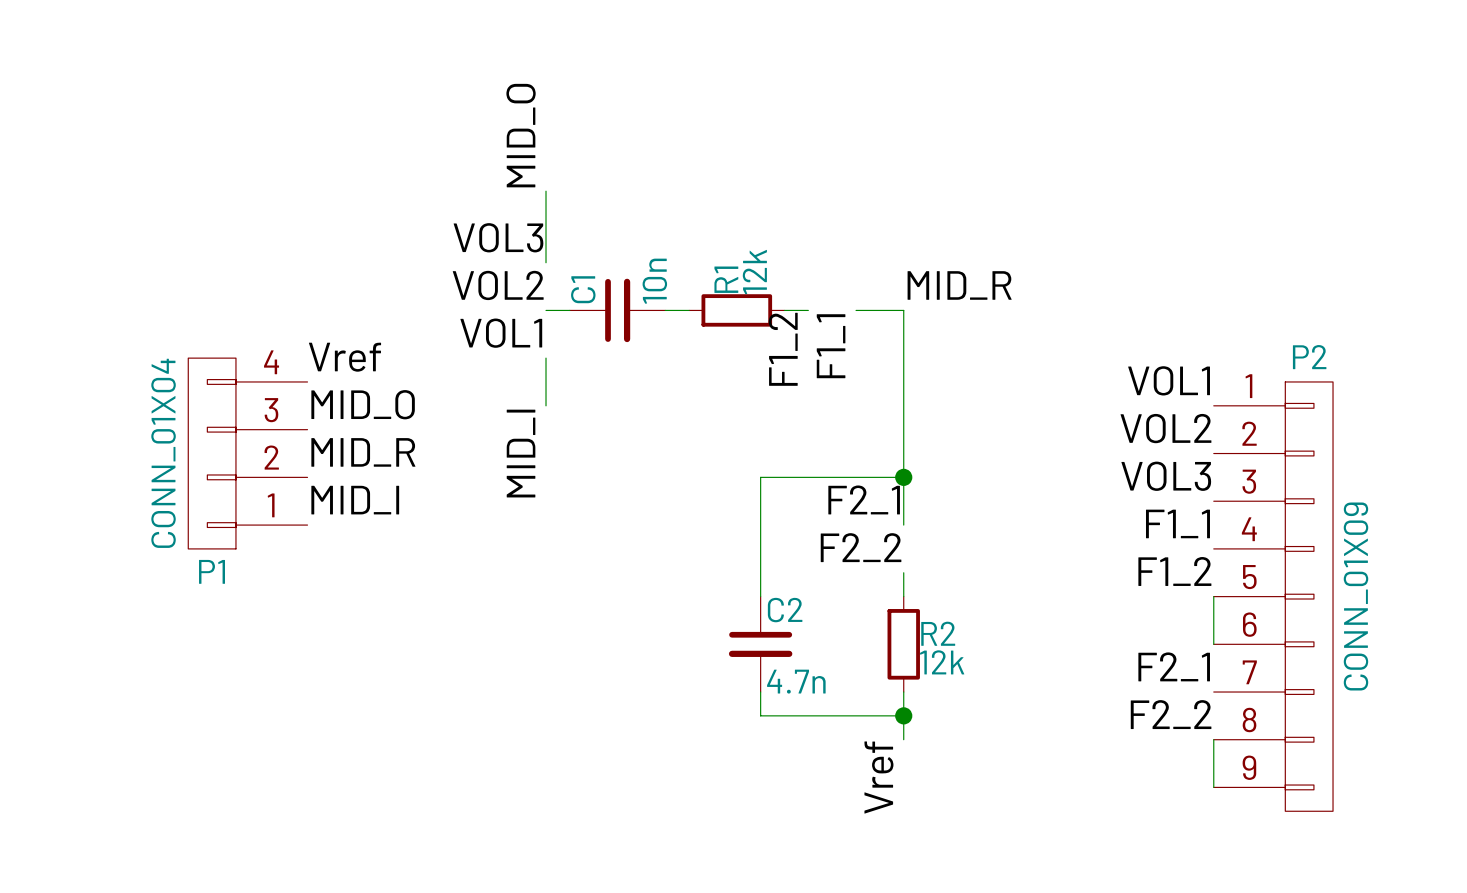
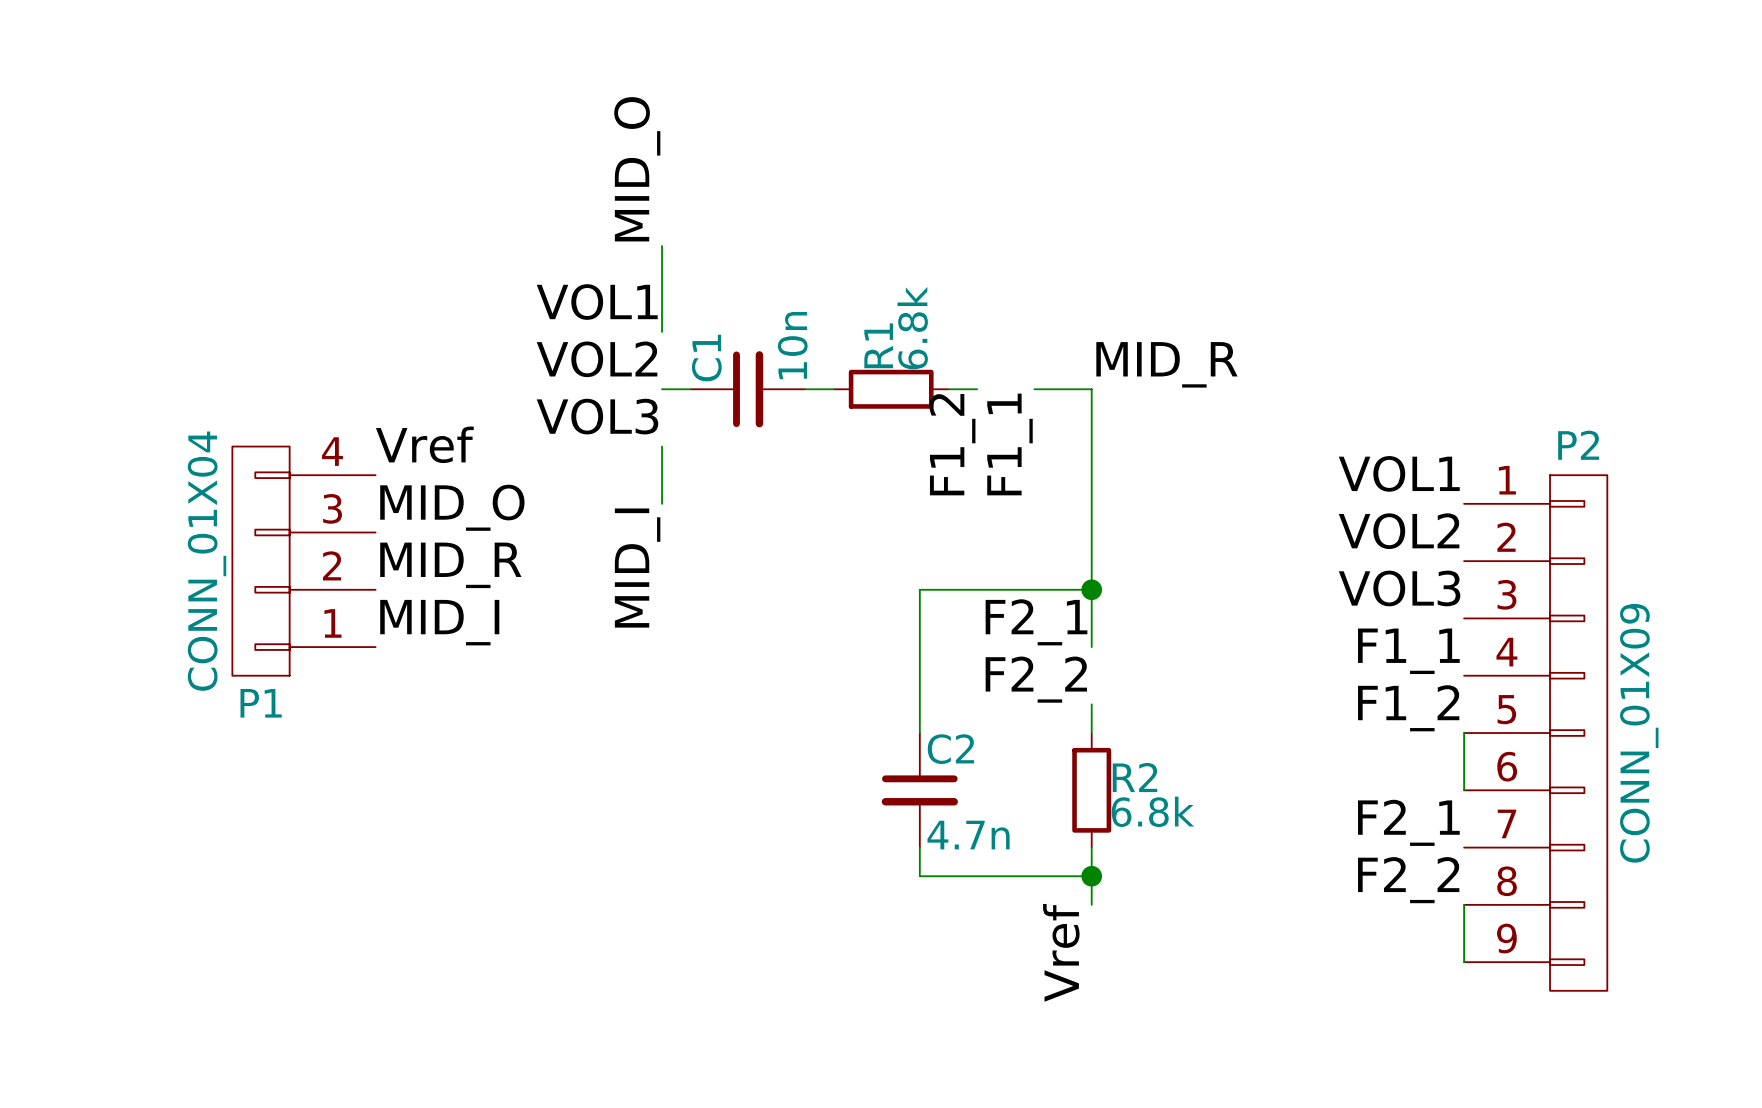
label: VOL3 (498, 237) -> VOL1 (597, 302)
R1 value: 12k (754, 272) -> 6.8k (912, 328)
label: VOL1 (501, 333) -> VOL3 (597, 416)
R2 value: 12k (942, 662) -> 6.8k (1152, 811)

